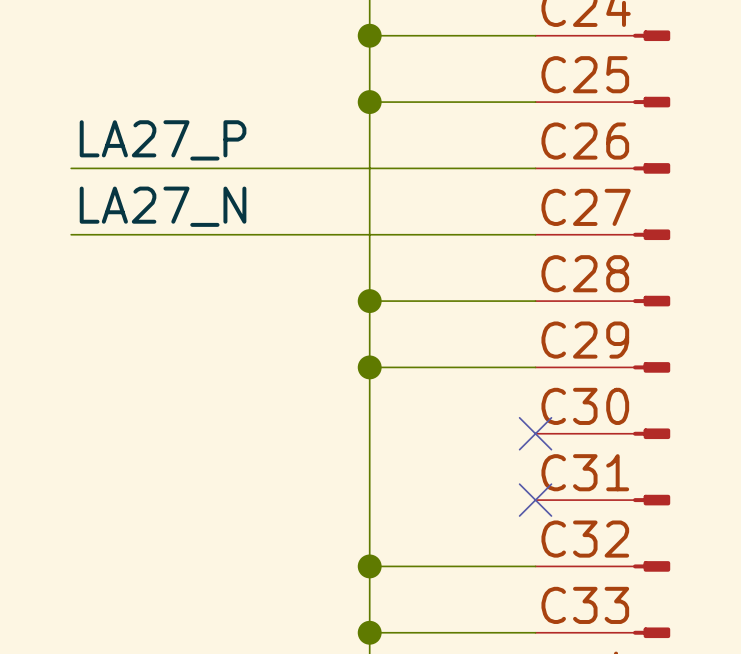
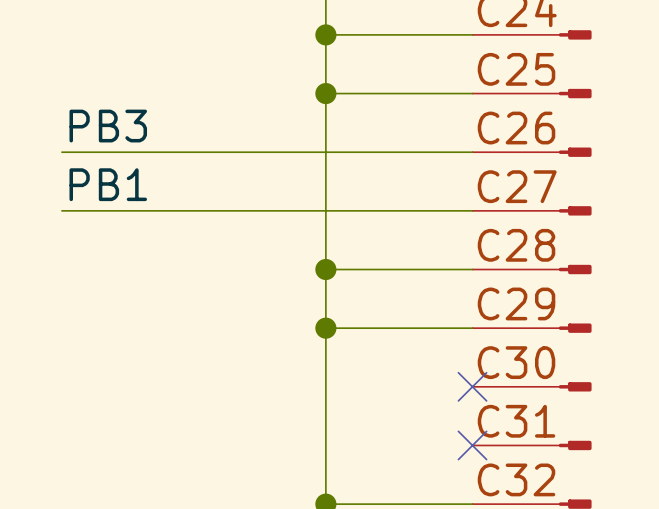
label: LA27_P (163, 140) -> PB3 (108, 126)
label: LA27_N (163, 206) -> PB1 (108, 184)

